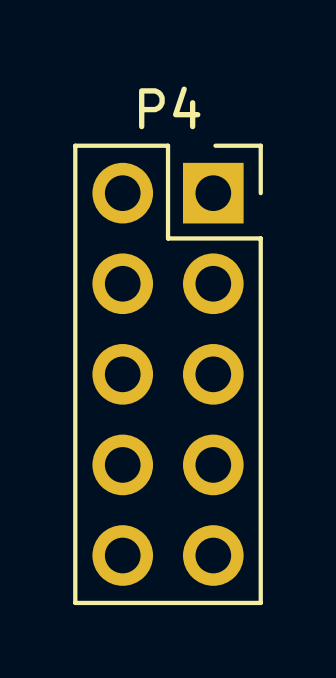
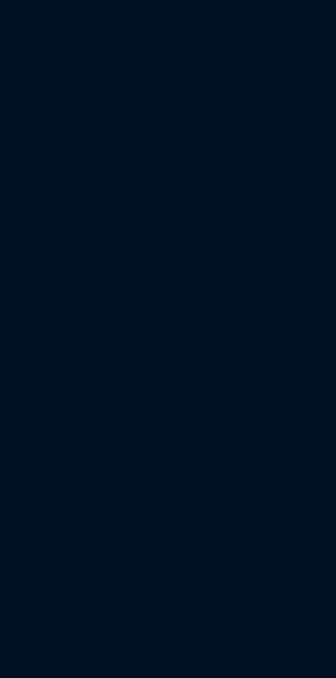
P4: (168, 374) -> none

